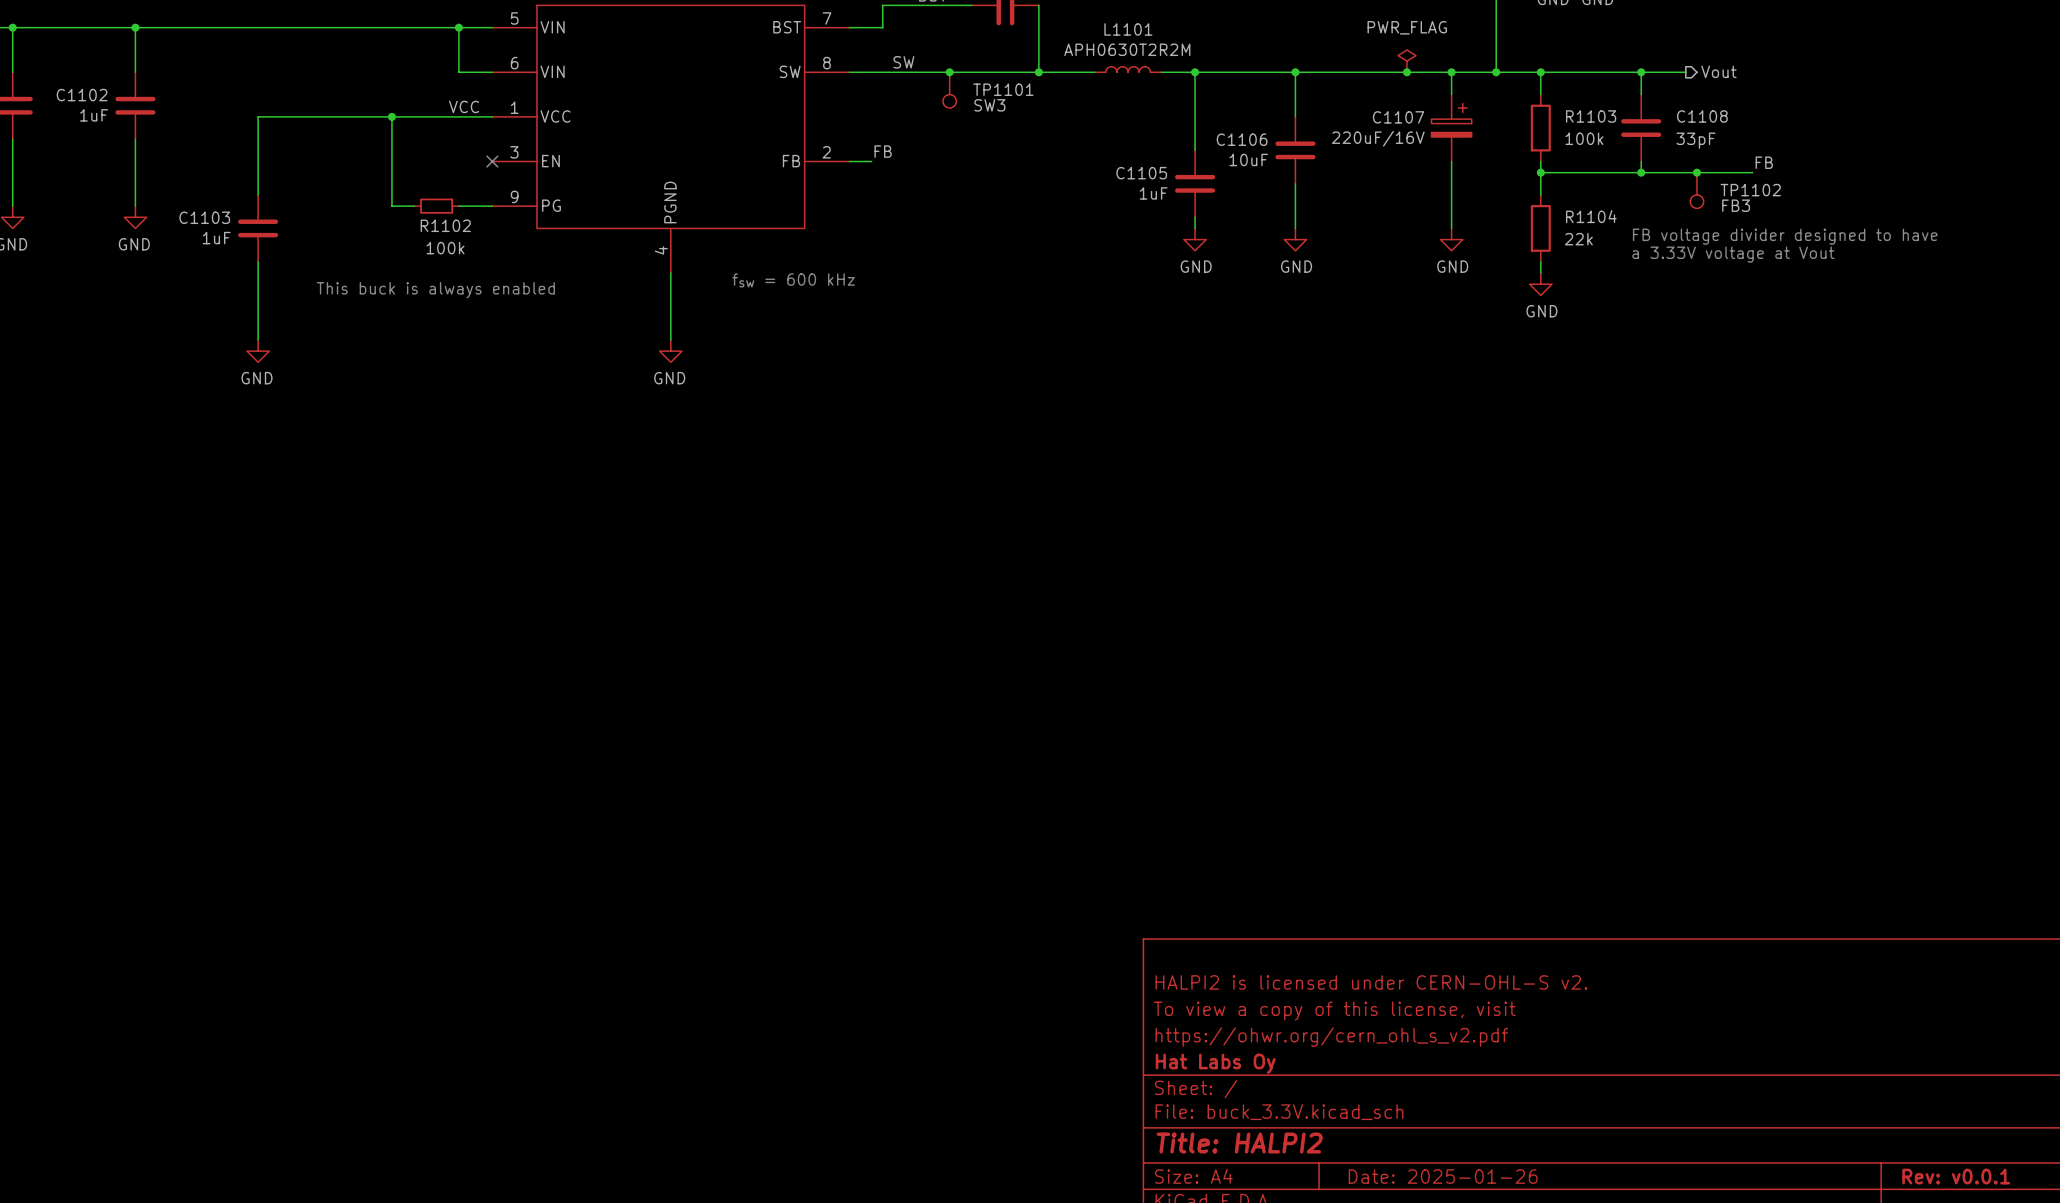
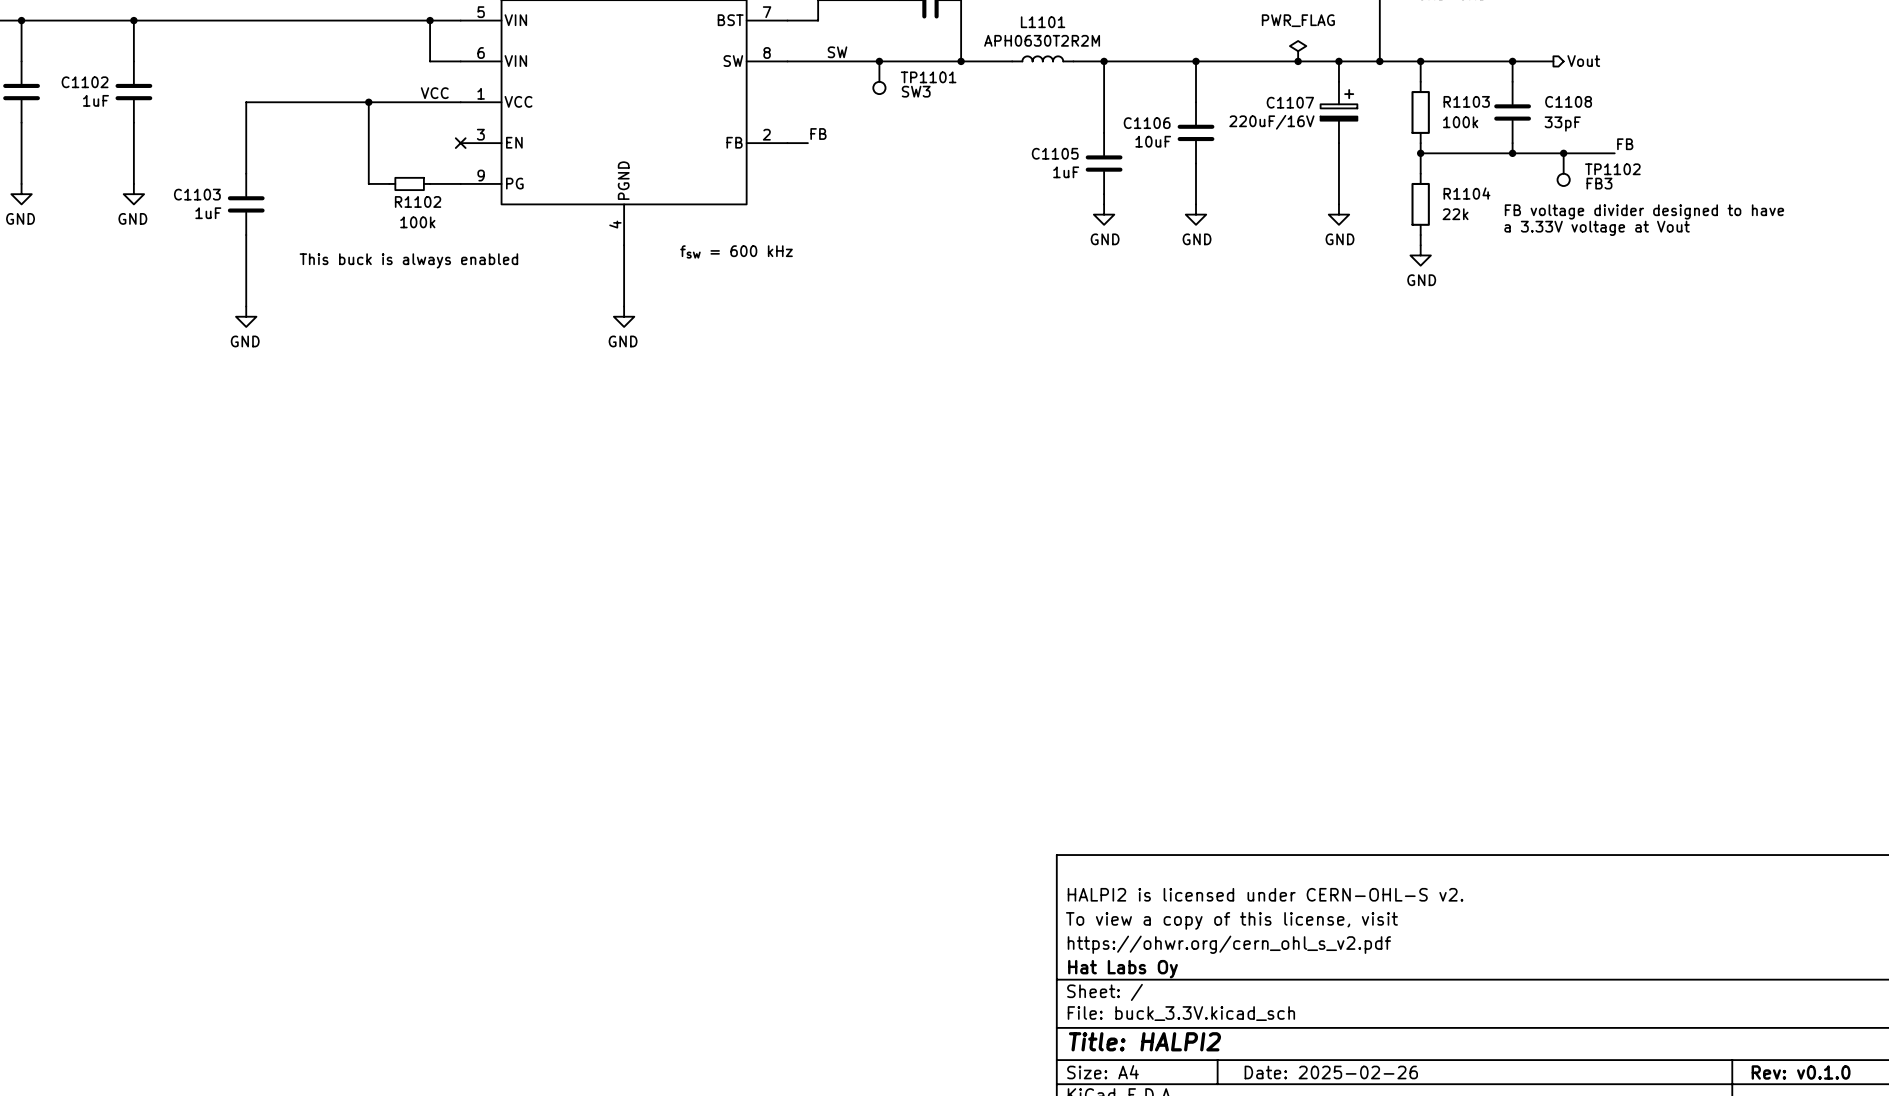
title block: Date: 2025-01-26 (1443, 1176) -> Date: 2025-02-26 (1331, 1072)
title block: Rev: v0.0.1 (1956, 1176) -> Rev: v0.1.0 (1801, 1072)

